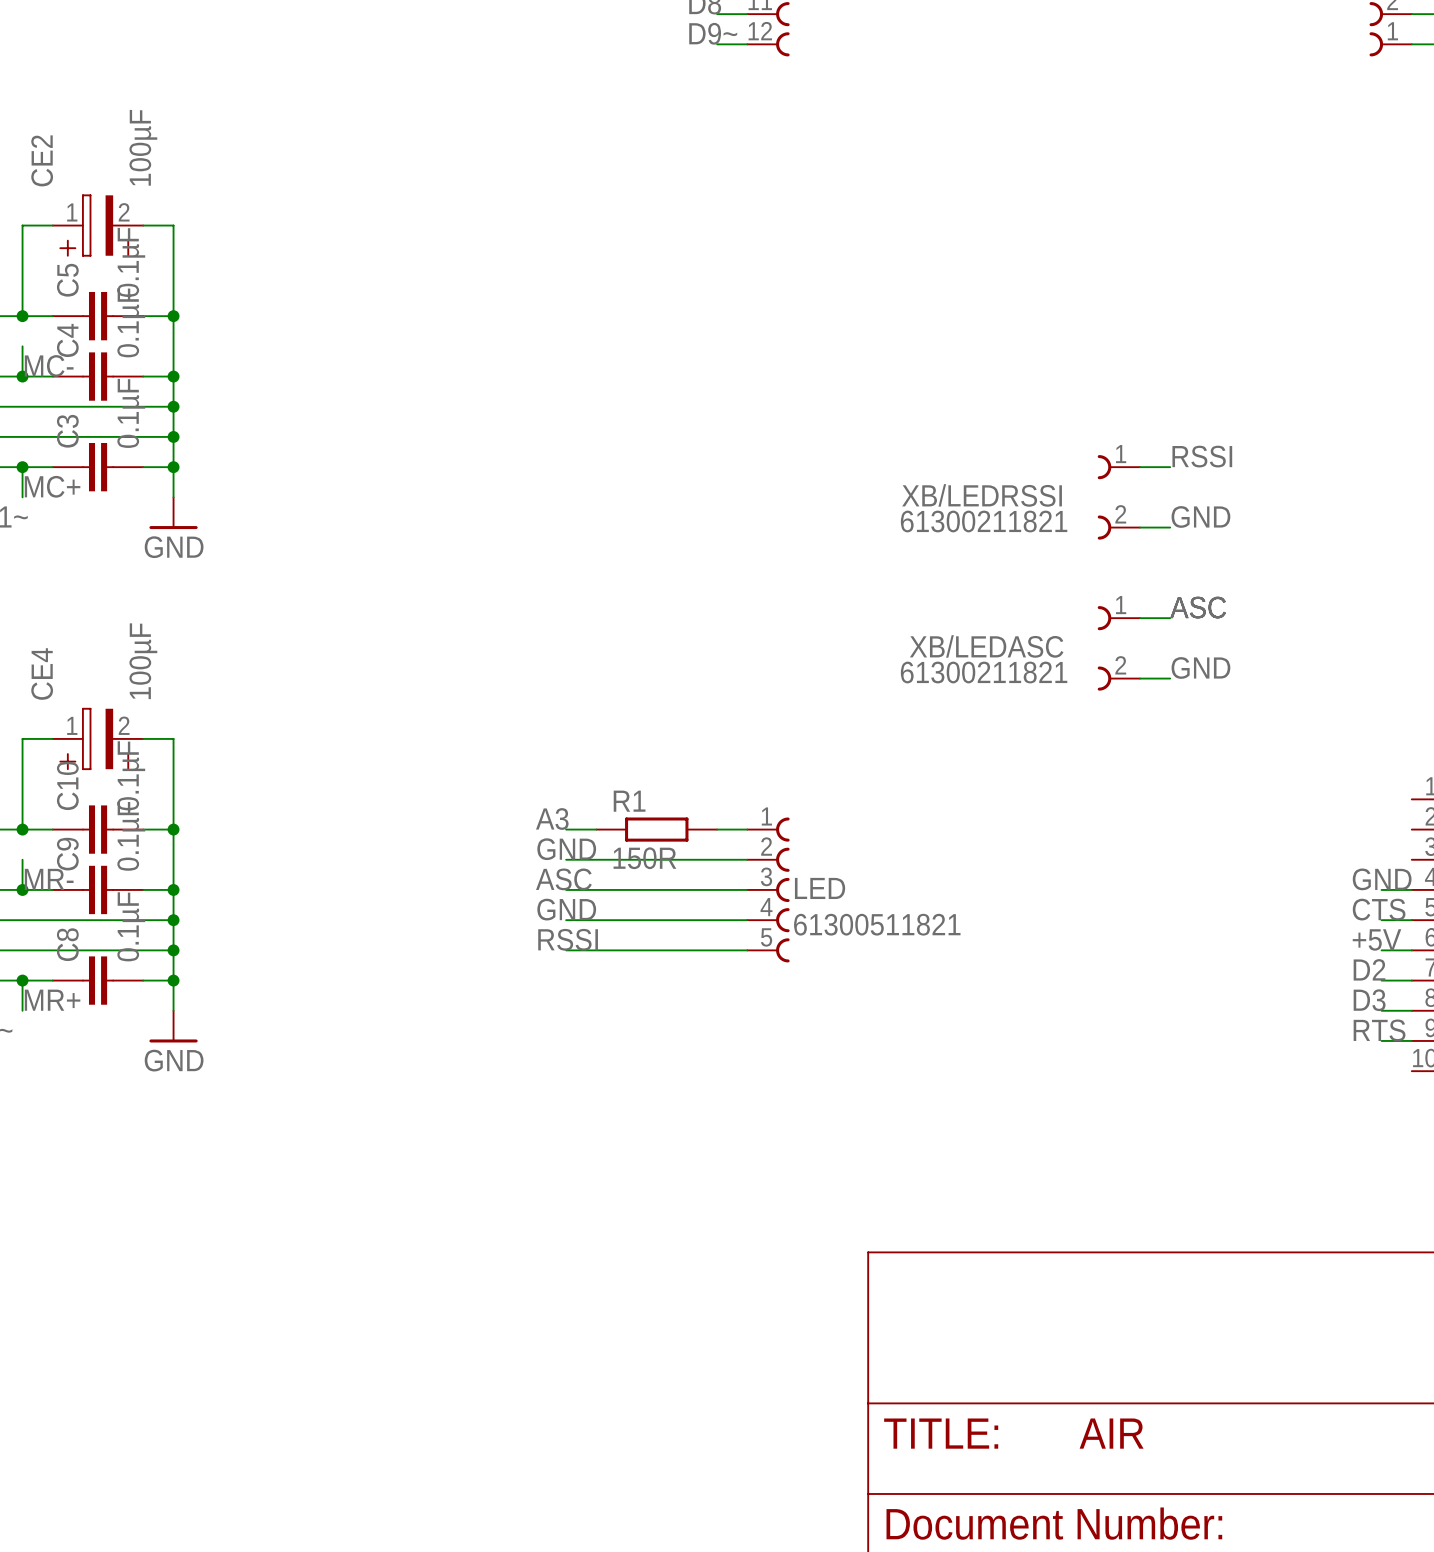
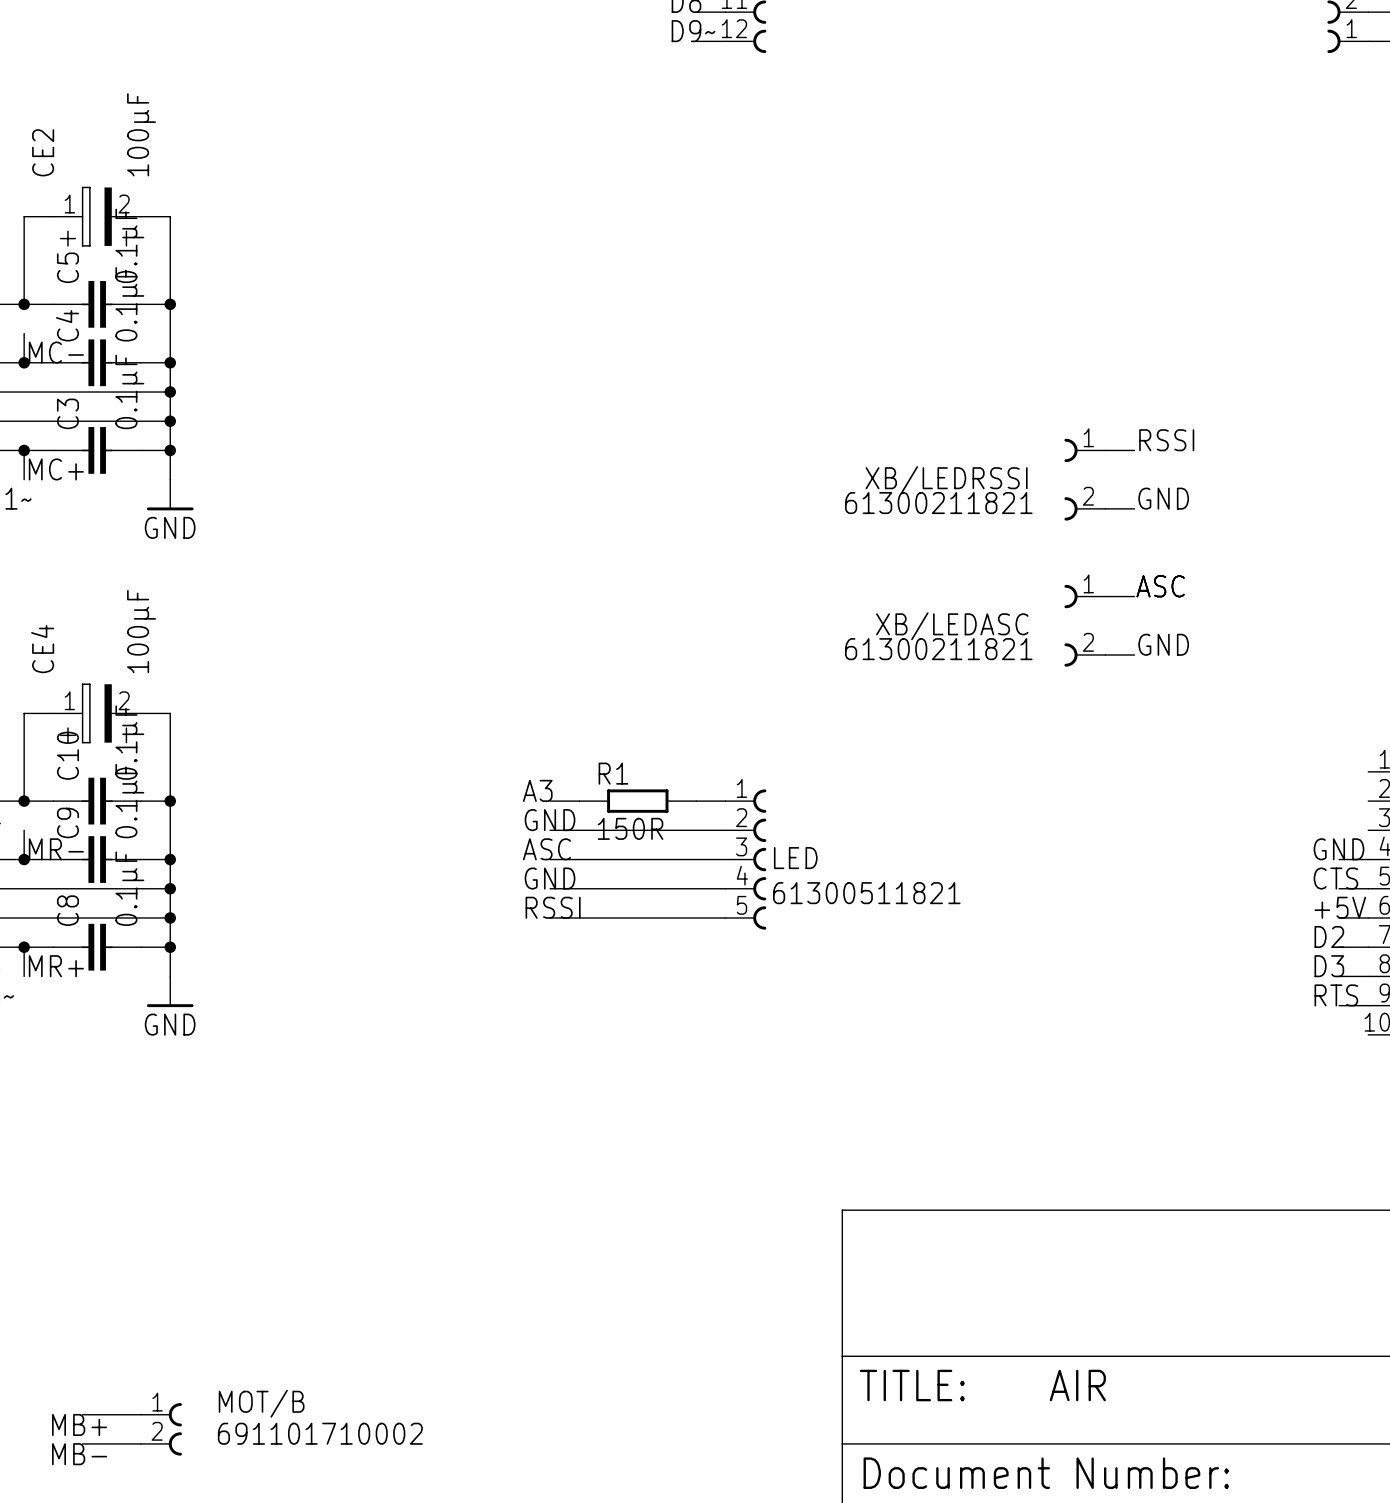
wire: none -> (82, 1414) (141, 1414)
label: none -> MB+ (79, 1424)
MOT/B: none -> 691101710002 (161, 1429)
wire: none -> (82, 1443) (141, 1443)
label: none -> MB- (79, 1454)

